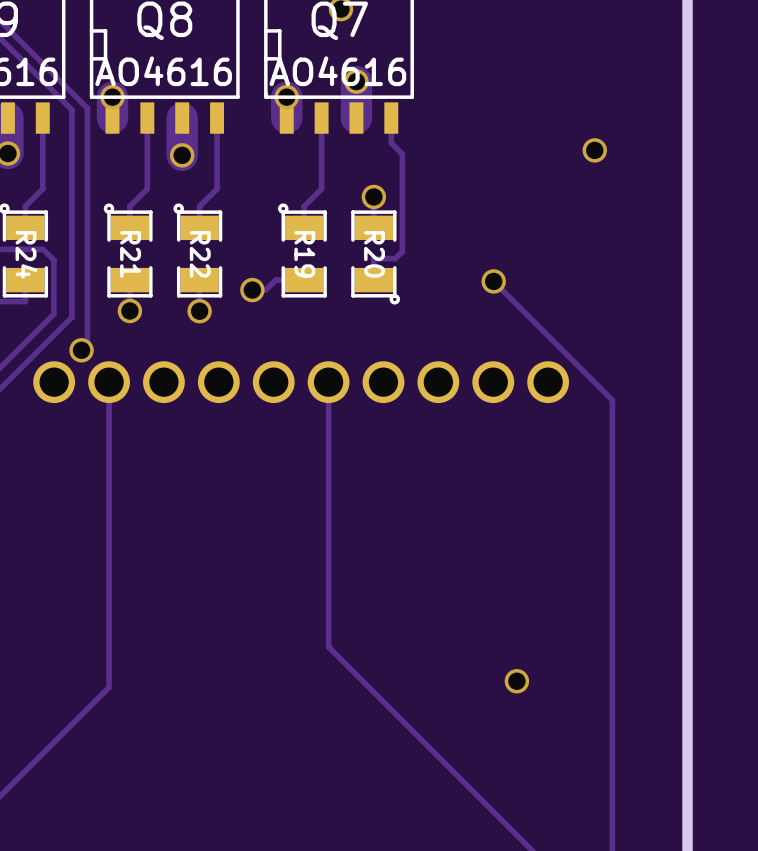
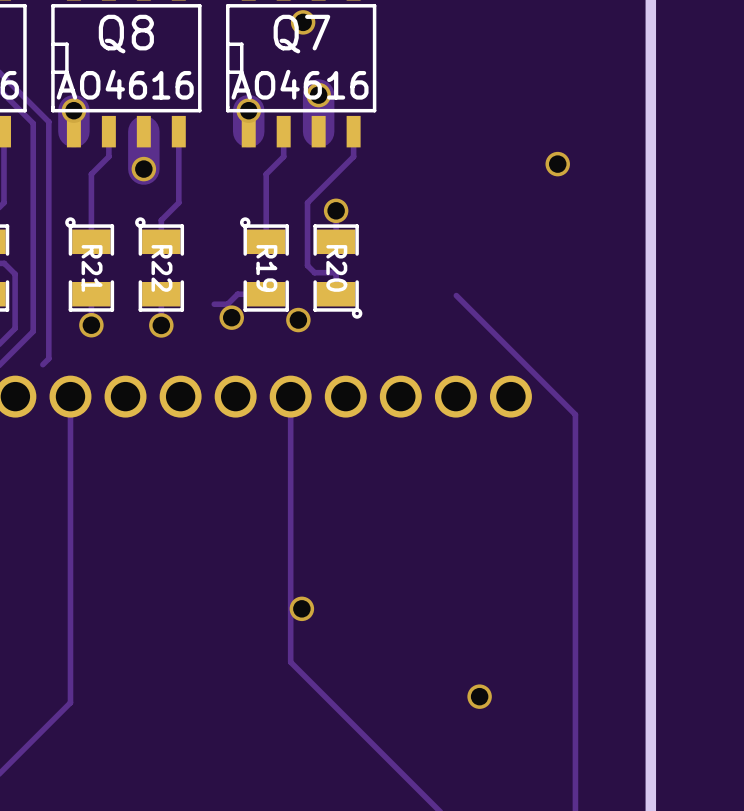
track: (147, 143) (147, 188) (129, 206) -> (108, 156) (91, 174) (91, 220)
track: (321, 143) (321, 188) (304, 206) -> (283, 156) (266, 174) (266, 220)
track: (391, 143) (402, 154) (402, 251) (395, 258) (373, 258) -> (353, 156) (307, 202) (307, 265) (314, 272) (336, 272)
via: (493, 281) -> none
via position: (252, 290) -> (231, 317)
via: none -> (298, 320)
via: (81, 350) -> none
via: none -> (301, 608)

